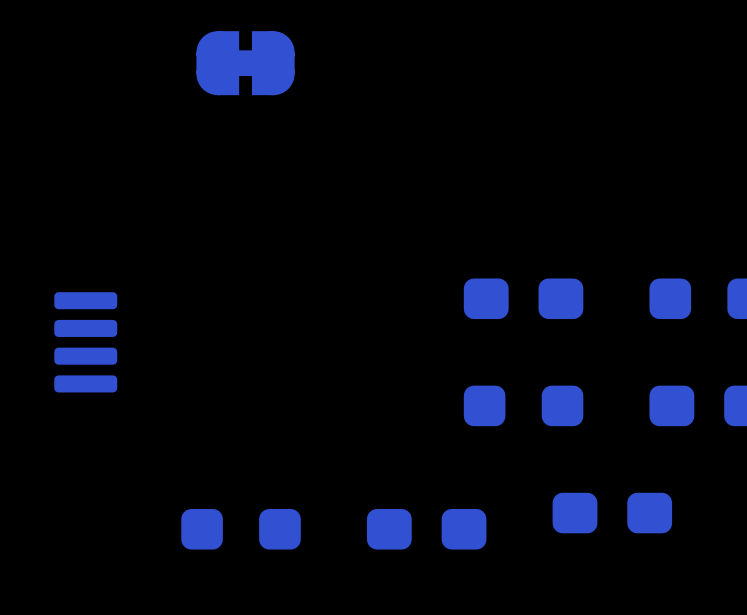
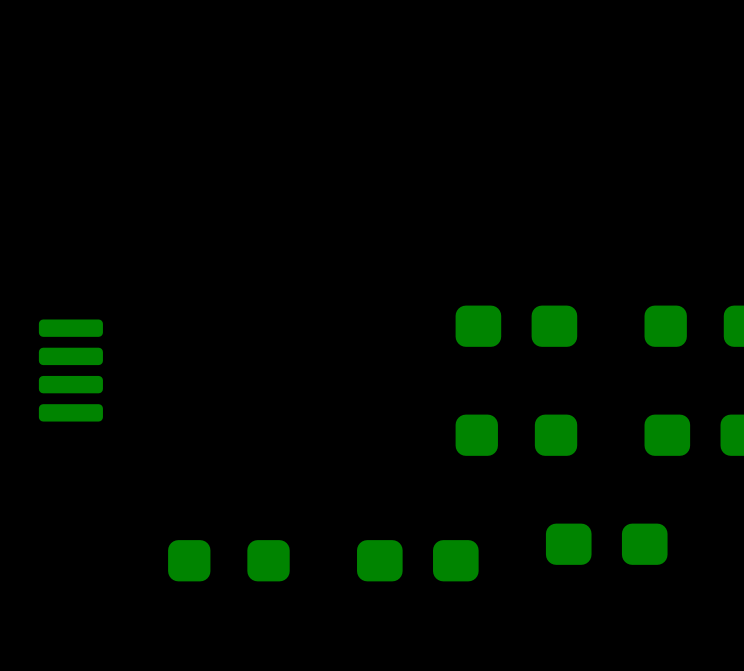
part: (245, 63) -> none

